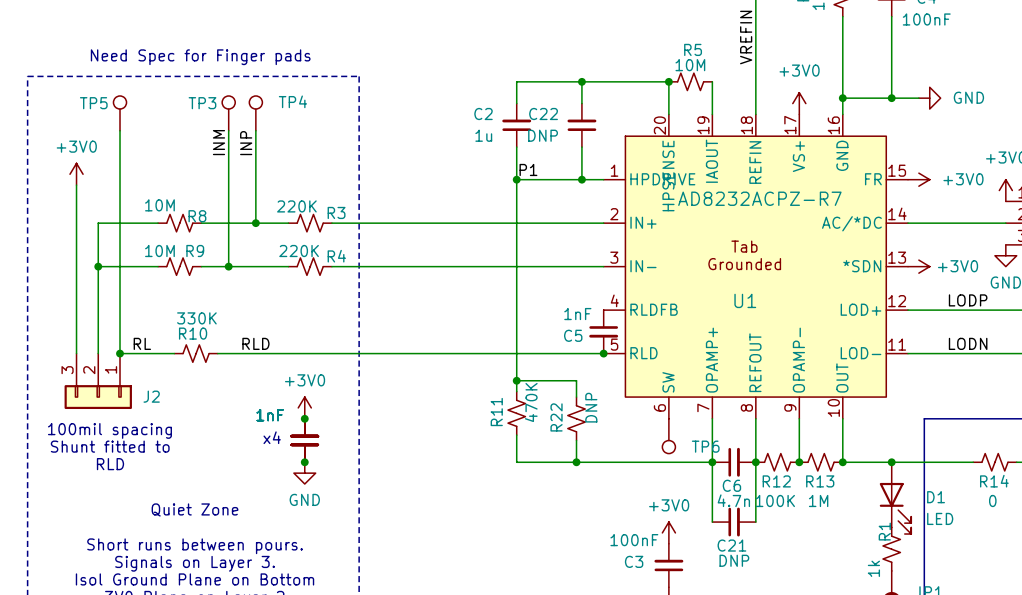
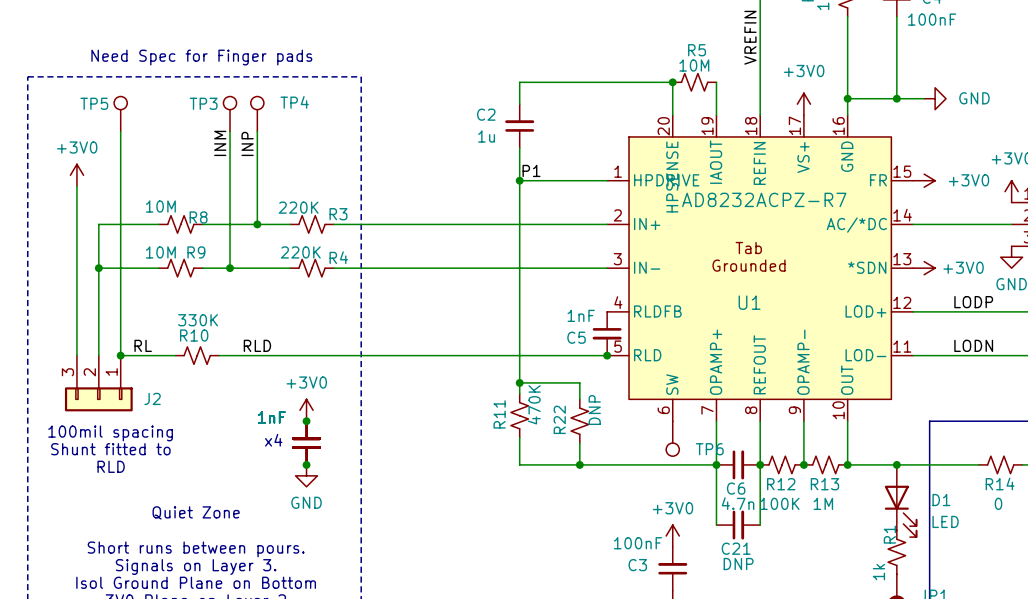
wire: (581, 81) (581, 103) -> none
junction: (581, 81) -> none
C22: DNP (581, 125) -> none
wire: (581, 147) (581, 179) -> none
junction: (581, 179) -> none

